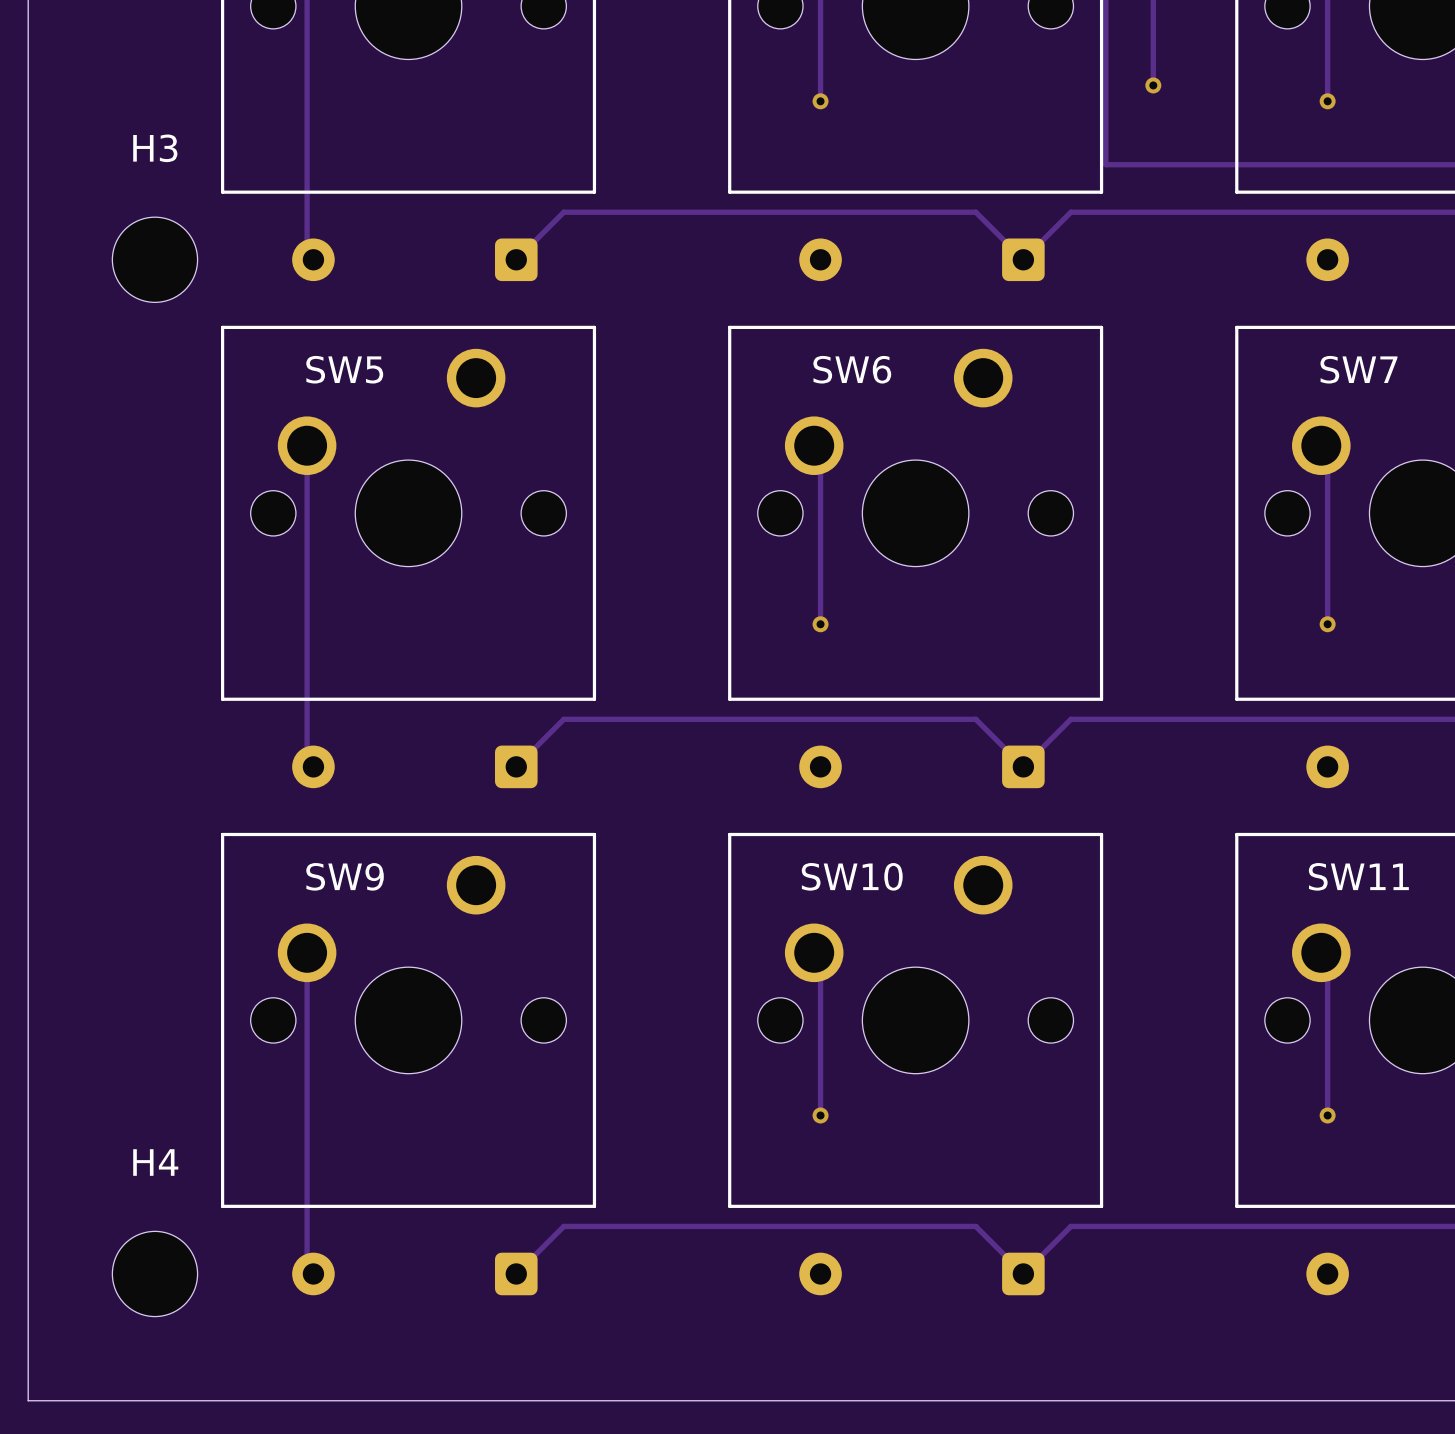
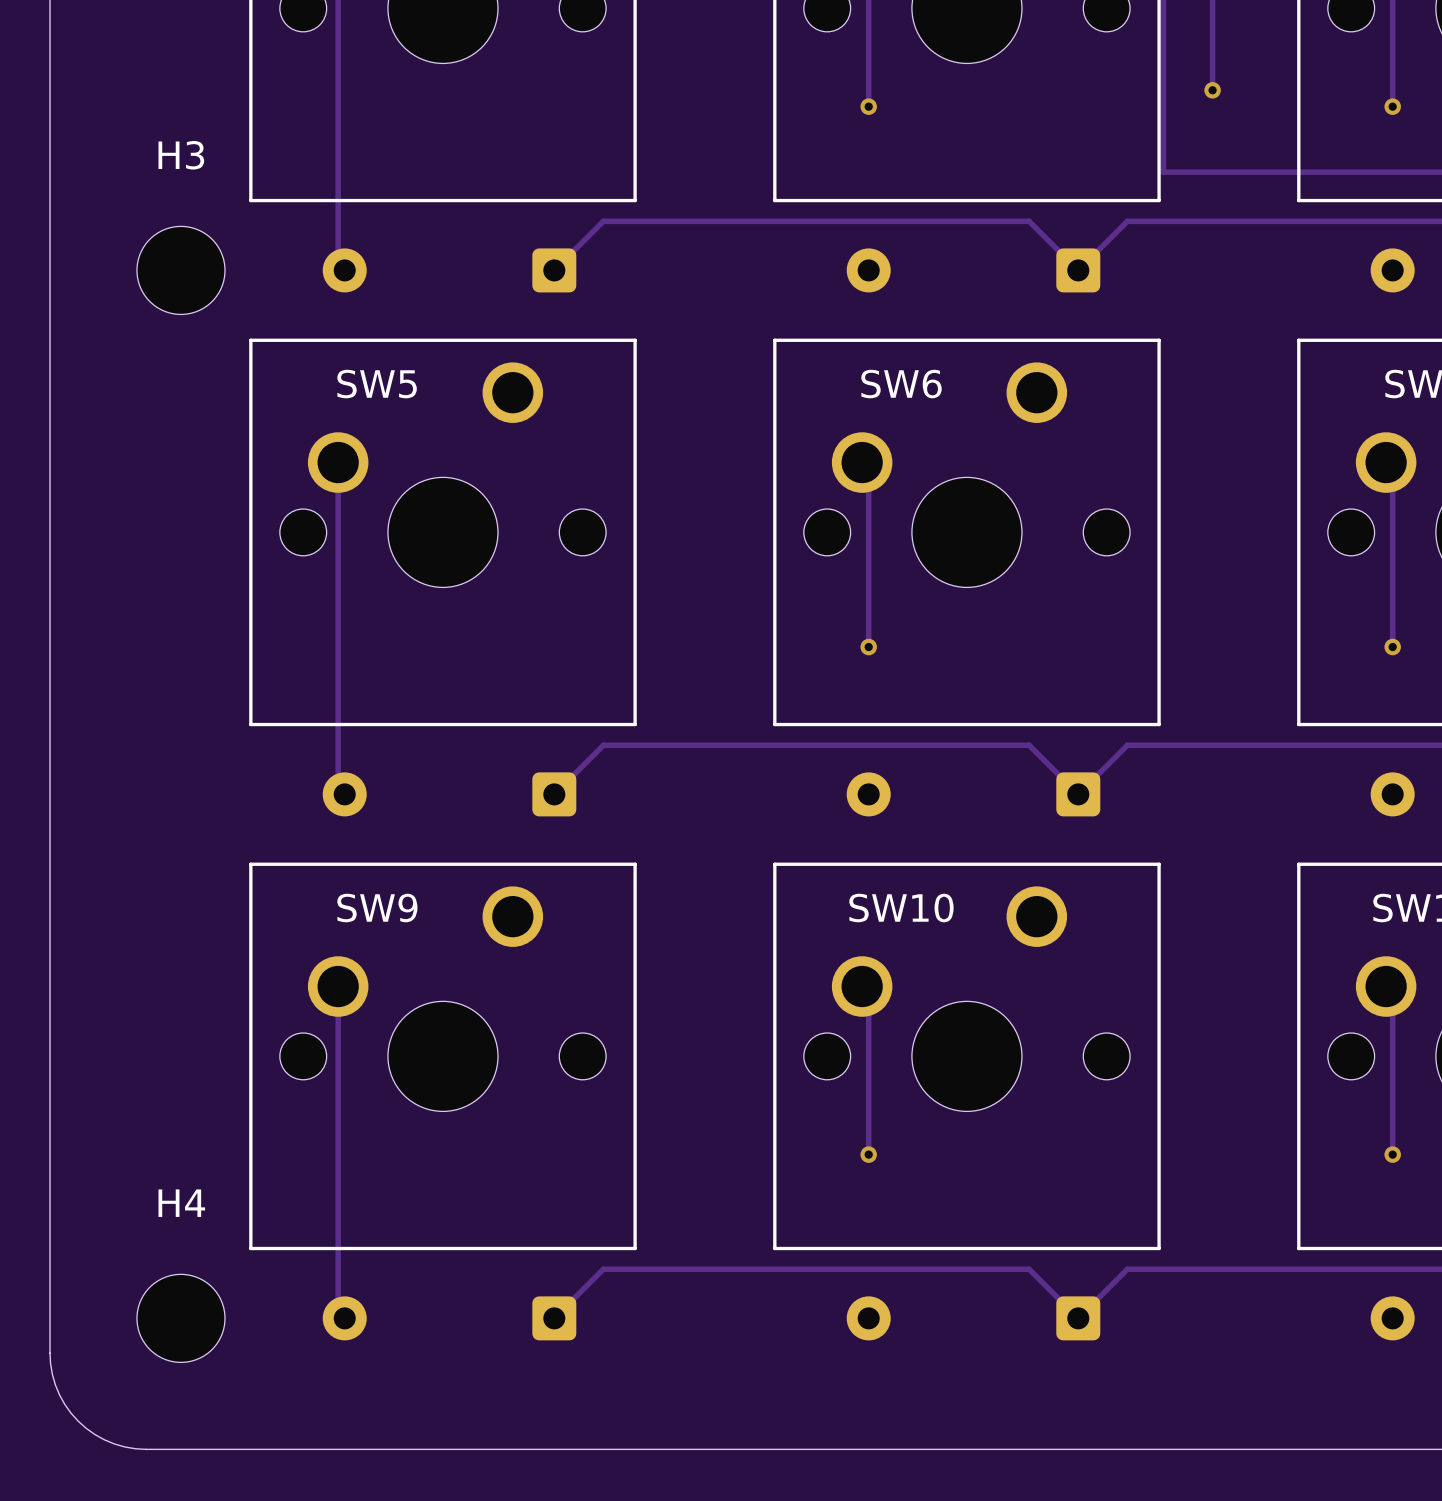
board edge: (28, 1307) (28, 1400) (121, 1400) -> (49, 1353) (55, 1384) (64, 1404) (78, 1421) (104, 1439) (124, 1446) (146, 1449)

